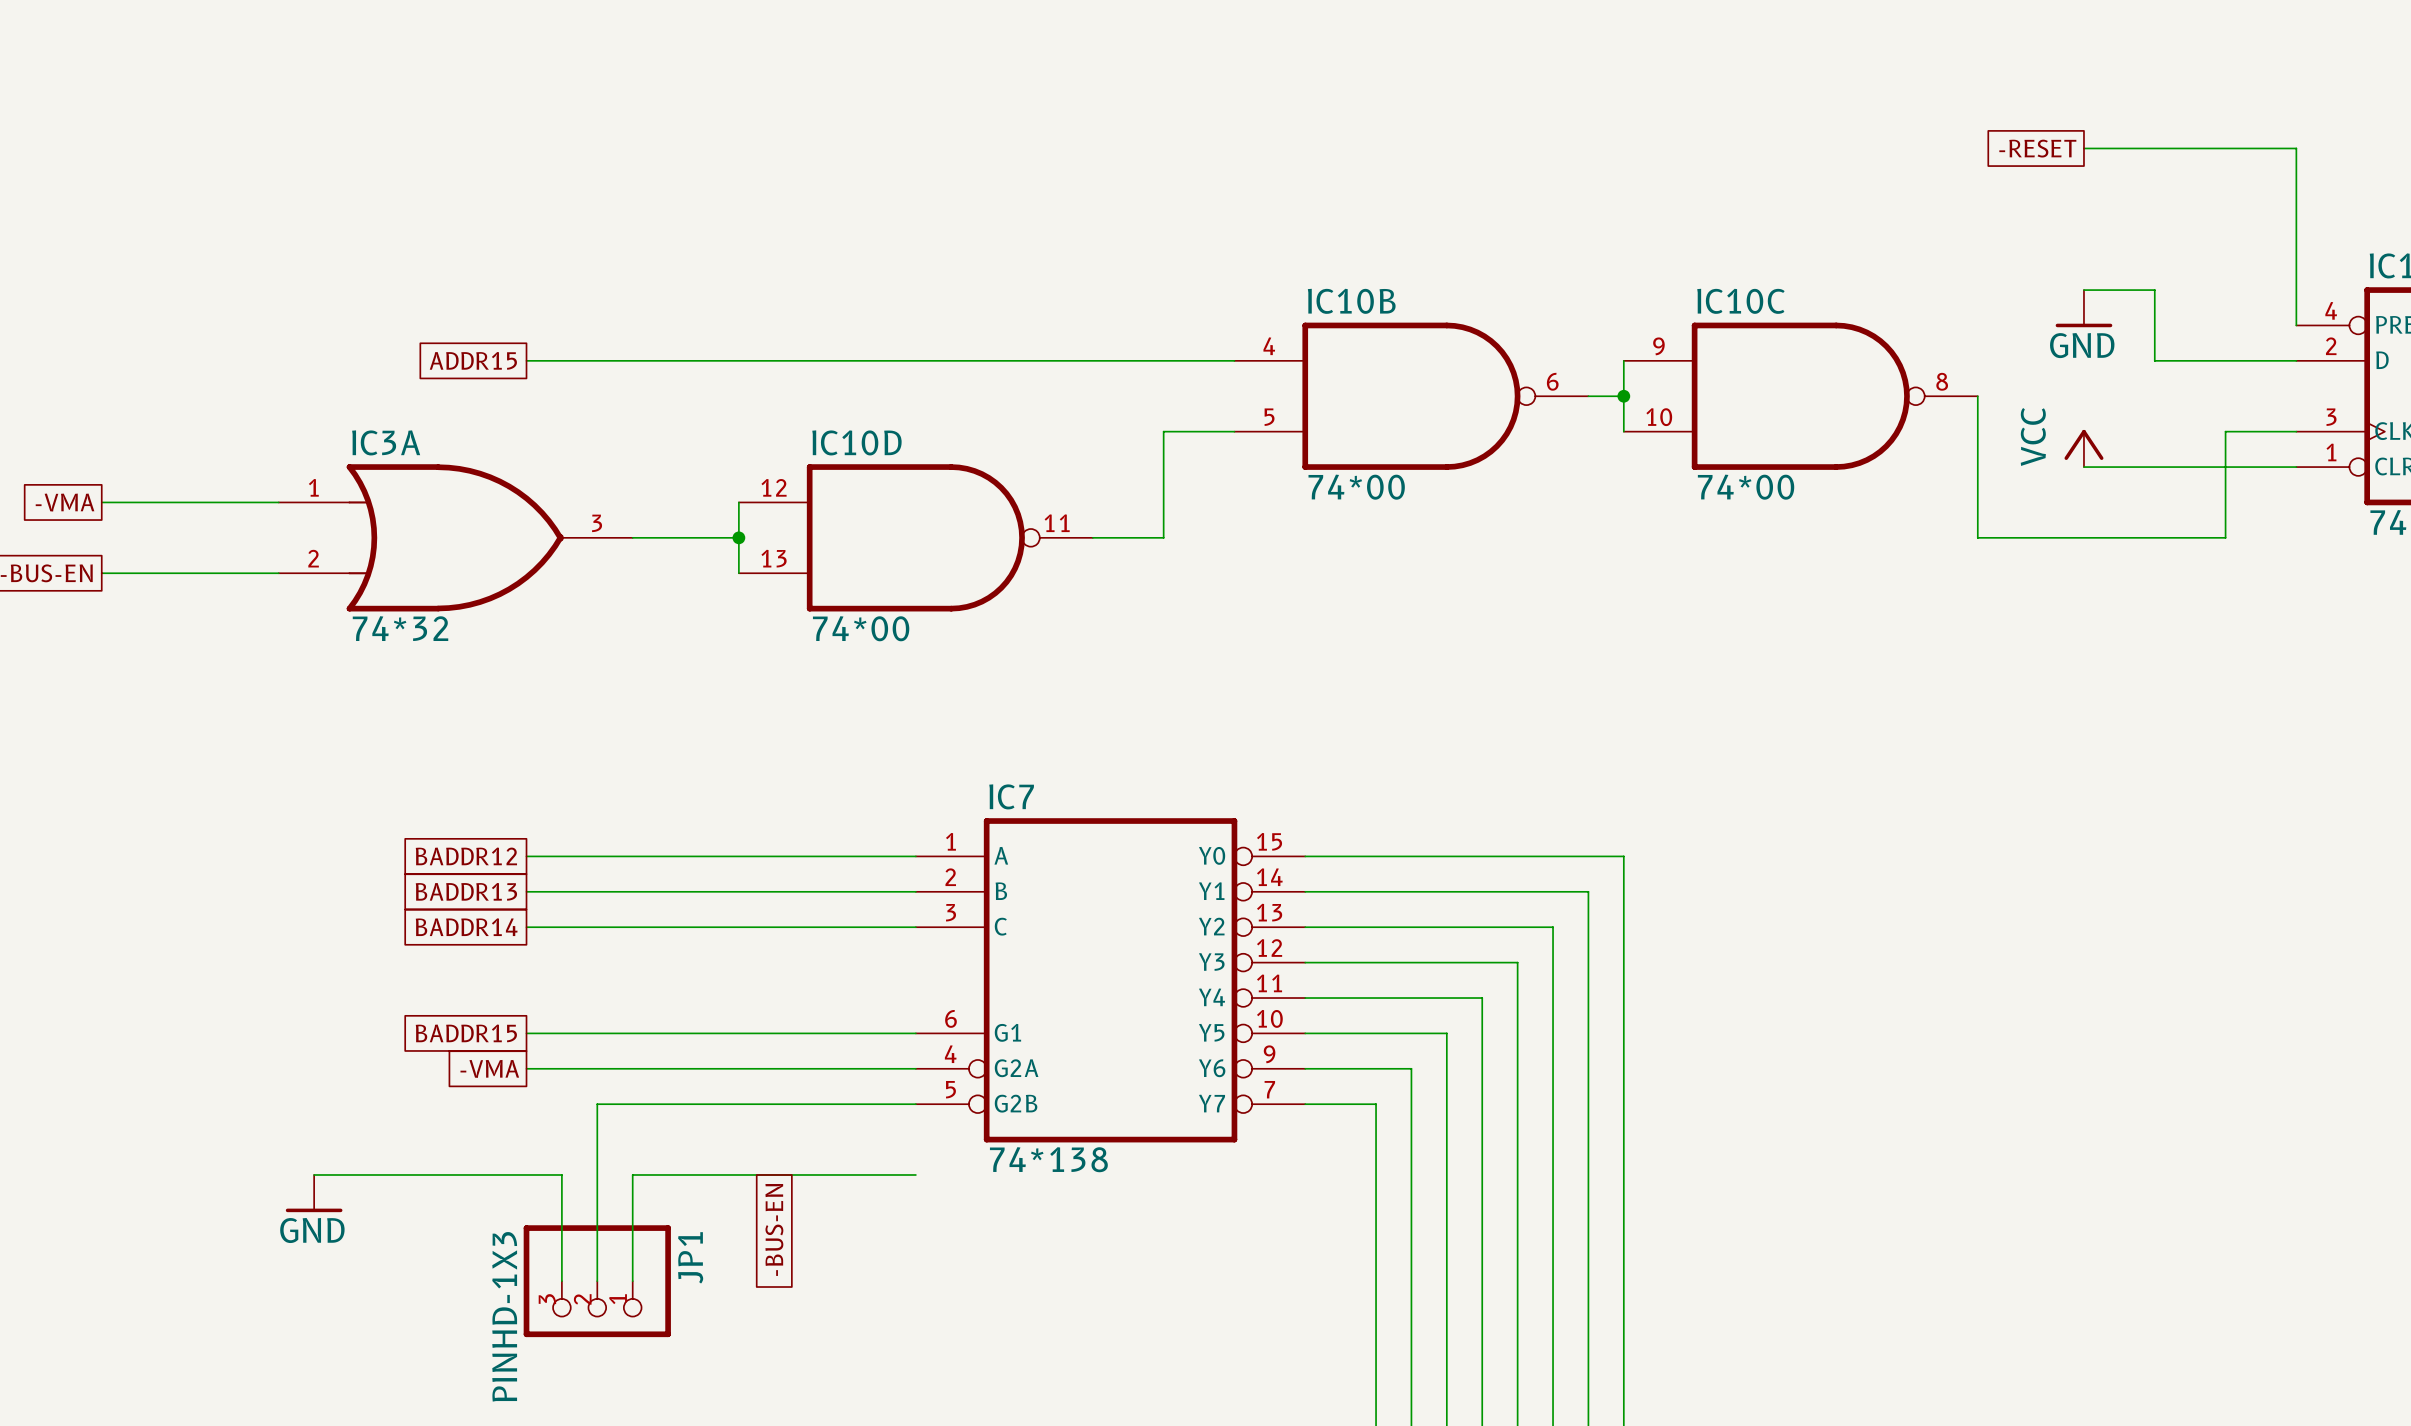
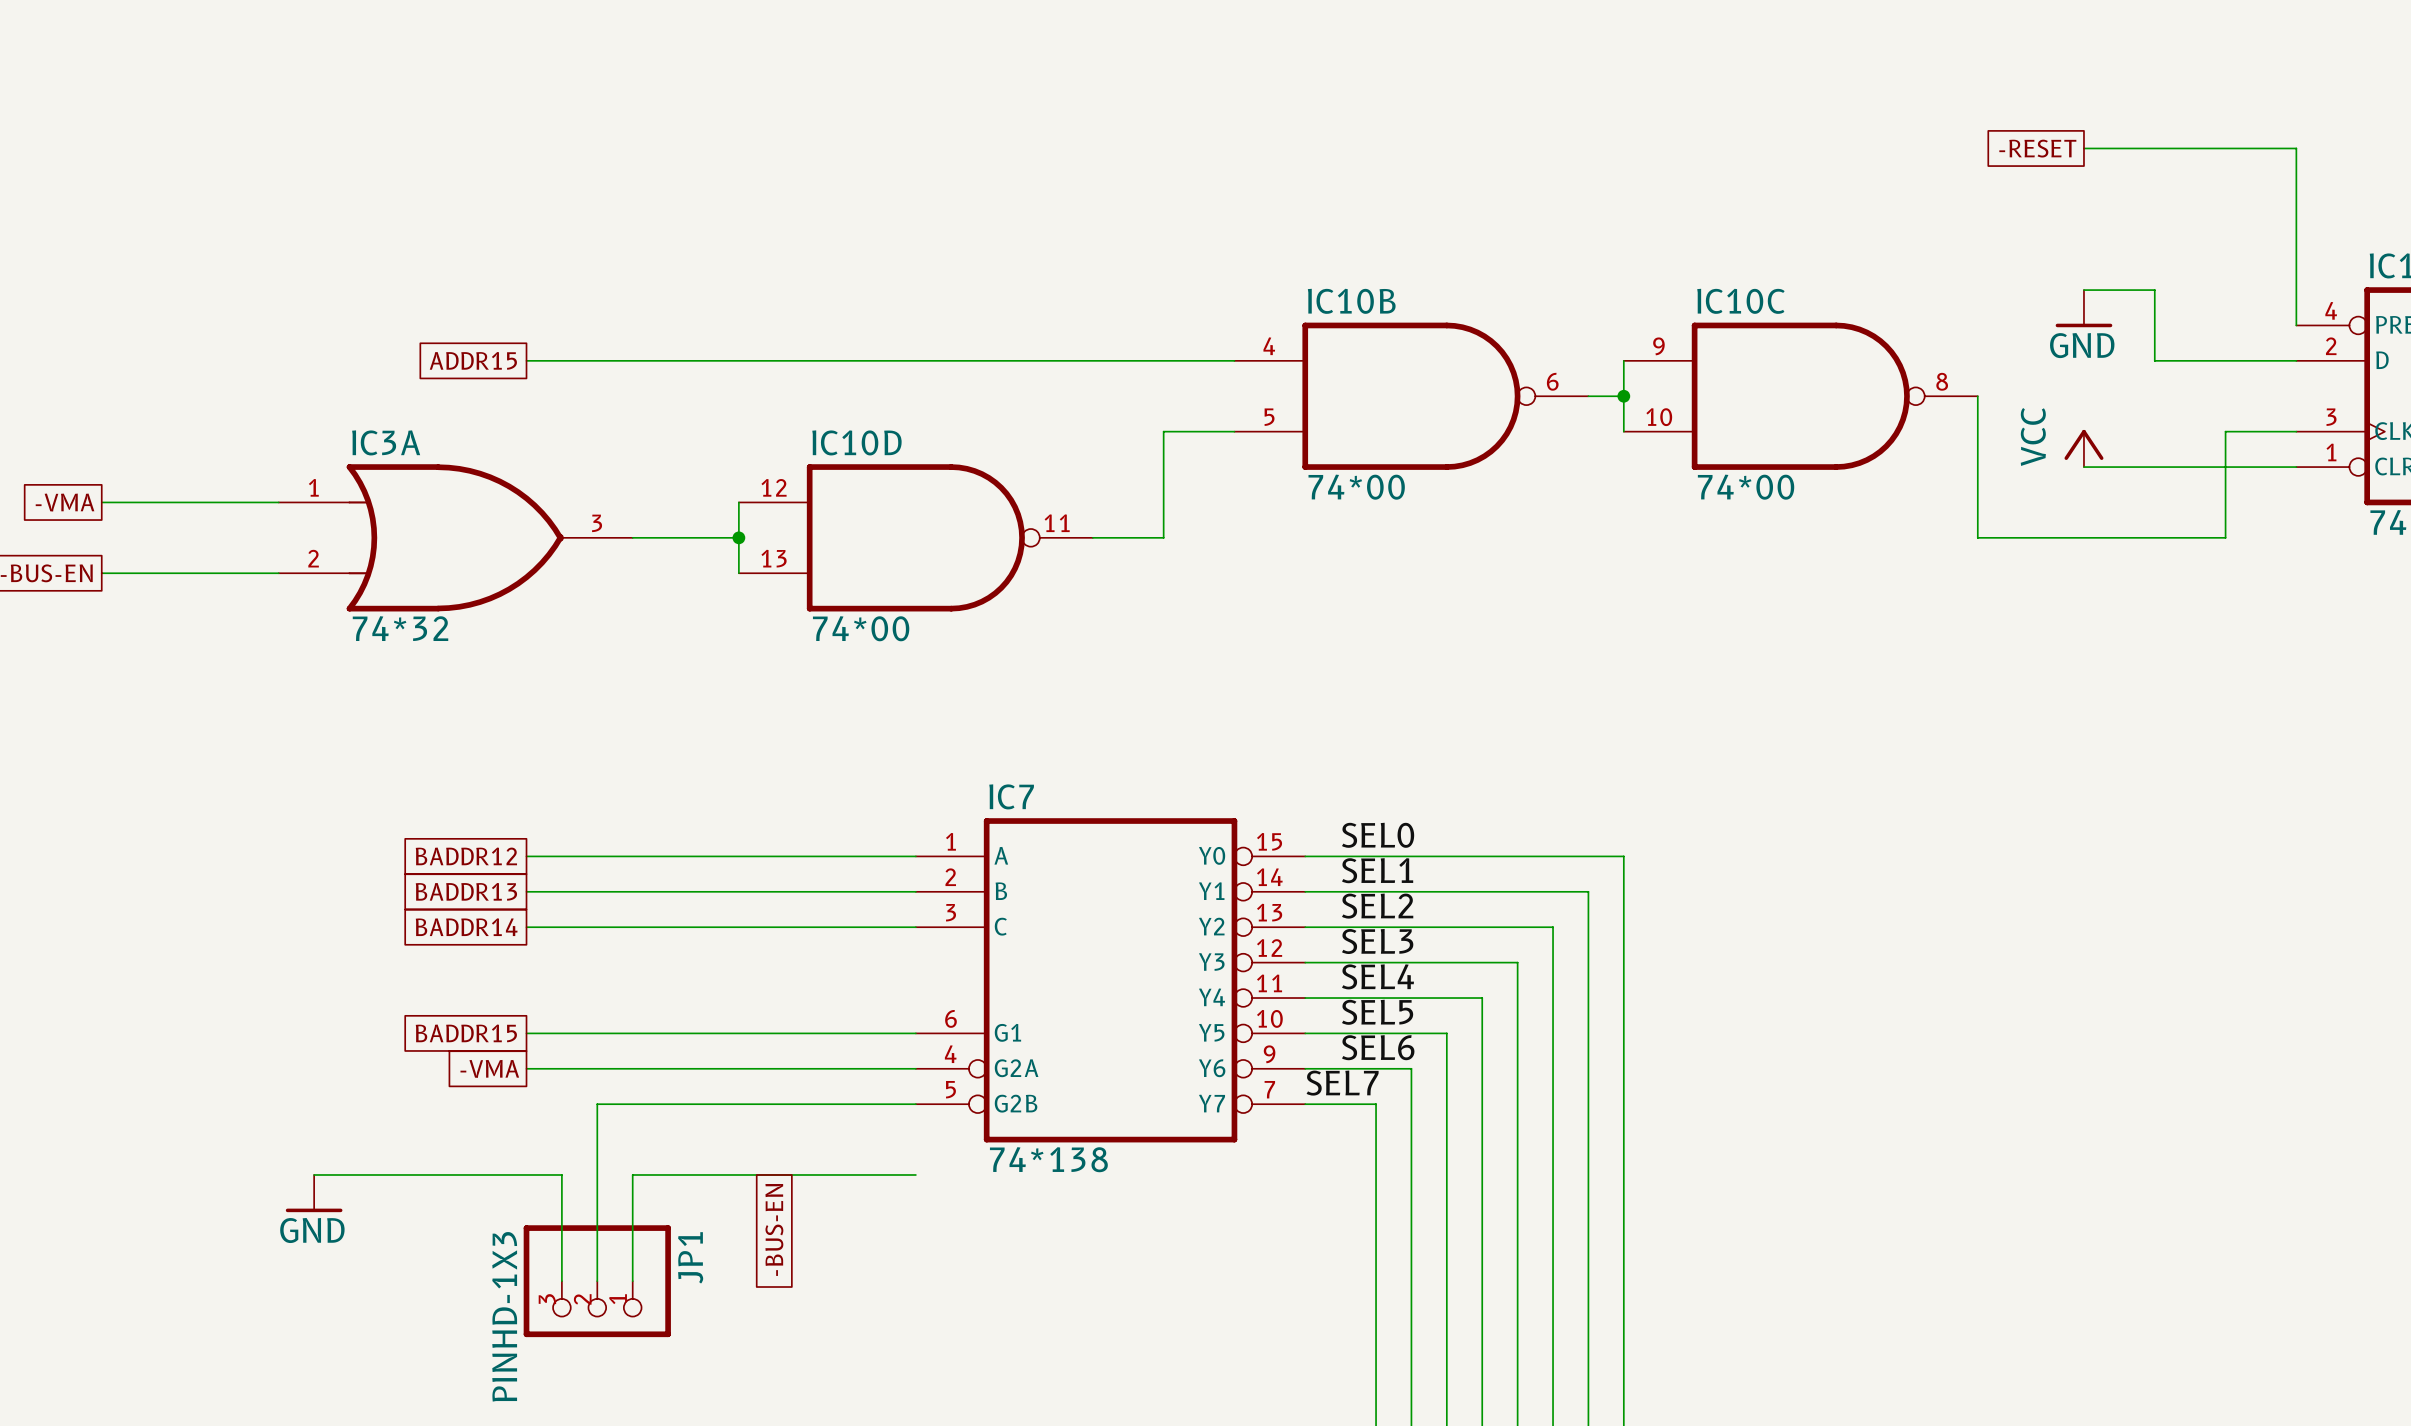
label: none -> SEL0 (1378, 835)
label: none -> SEL1 (1377, 870)
label: none -> SEL2 (1377, 906)
label: none -> SEL3 (1377, 941)
label: none -> SEL4 (1377, 976)
label: none -> SEL5 (1377, 1012)
label: none -> SEL6 (1378, 1047)
label: none -> SEL7 (1342, 1083)

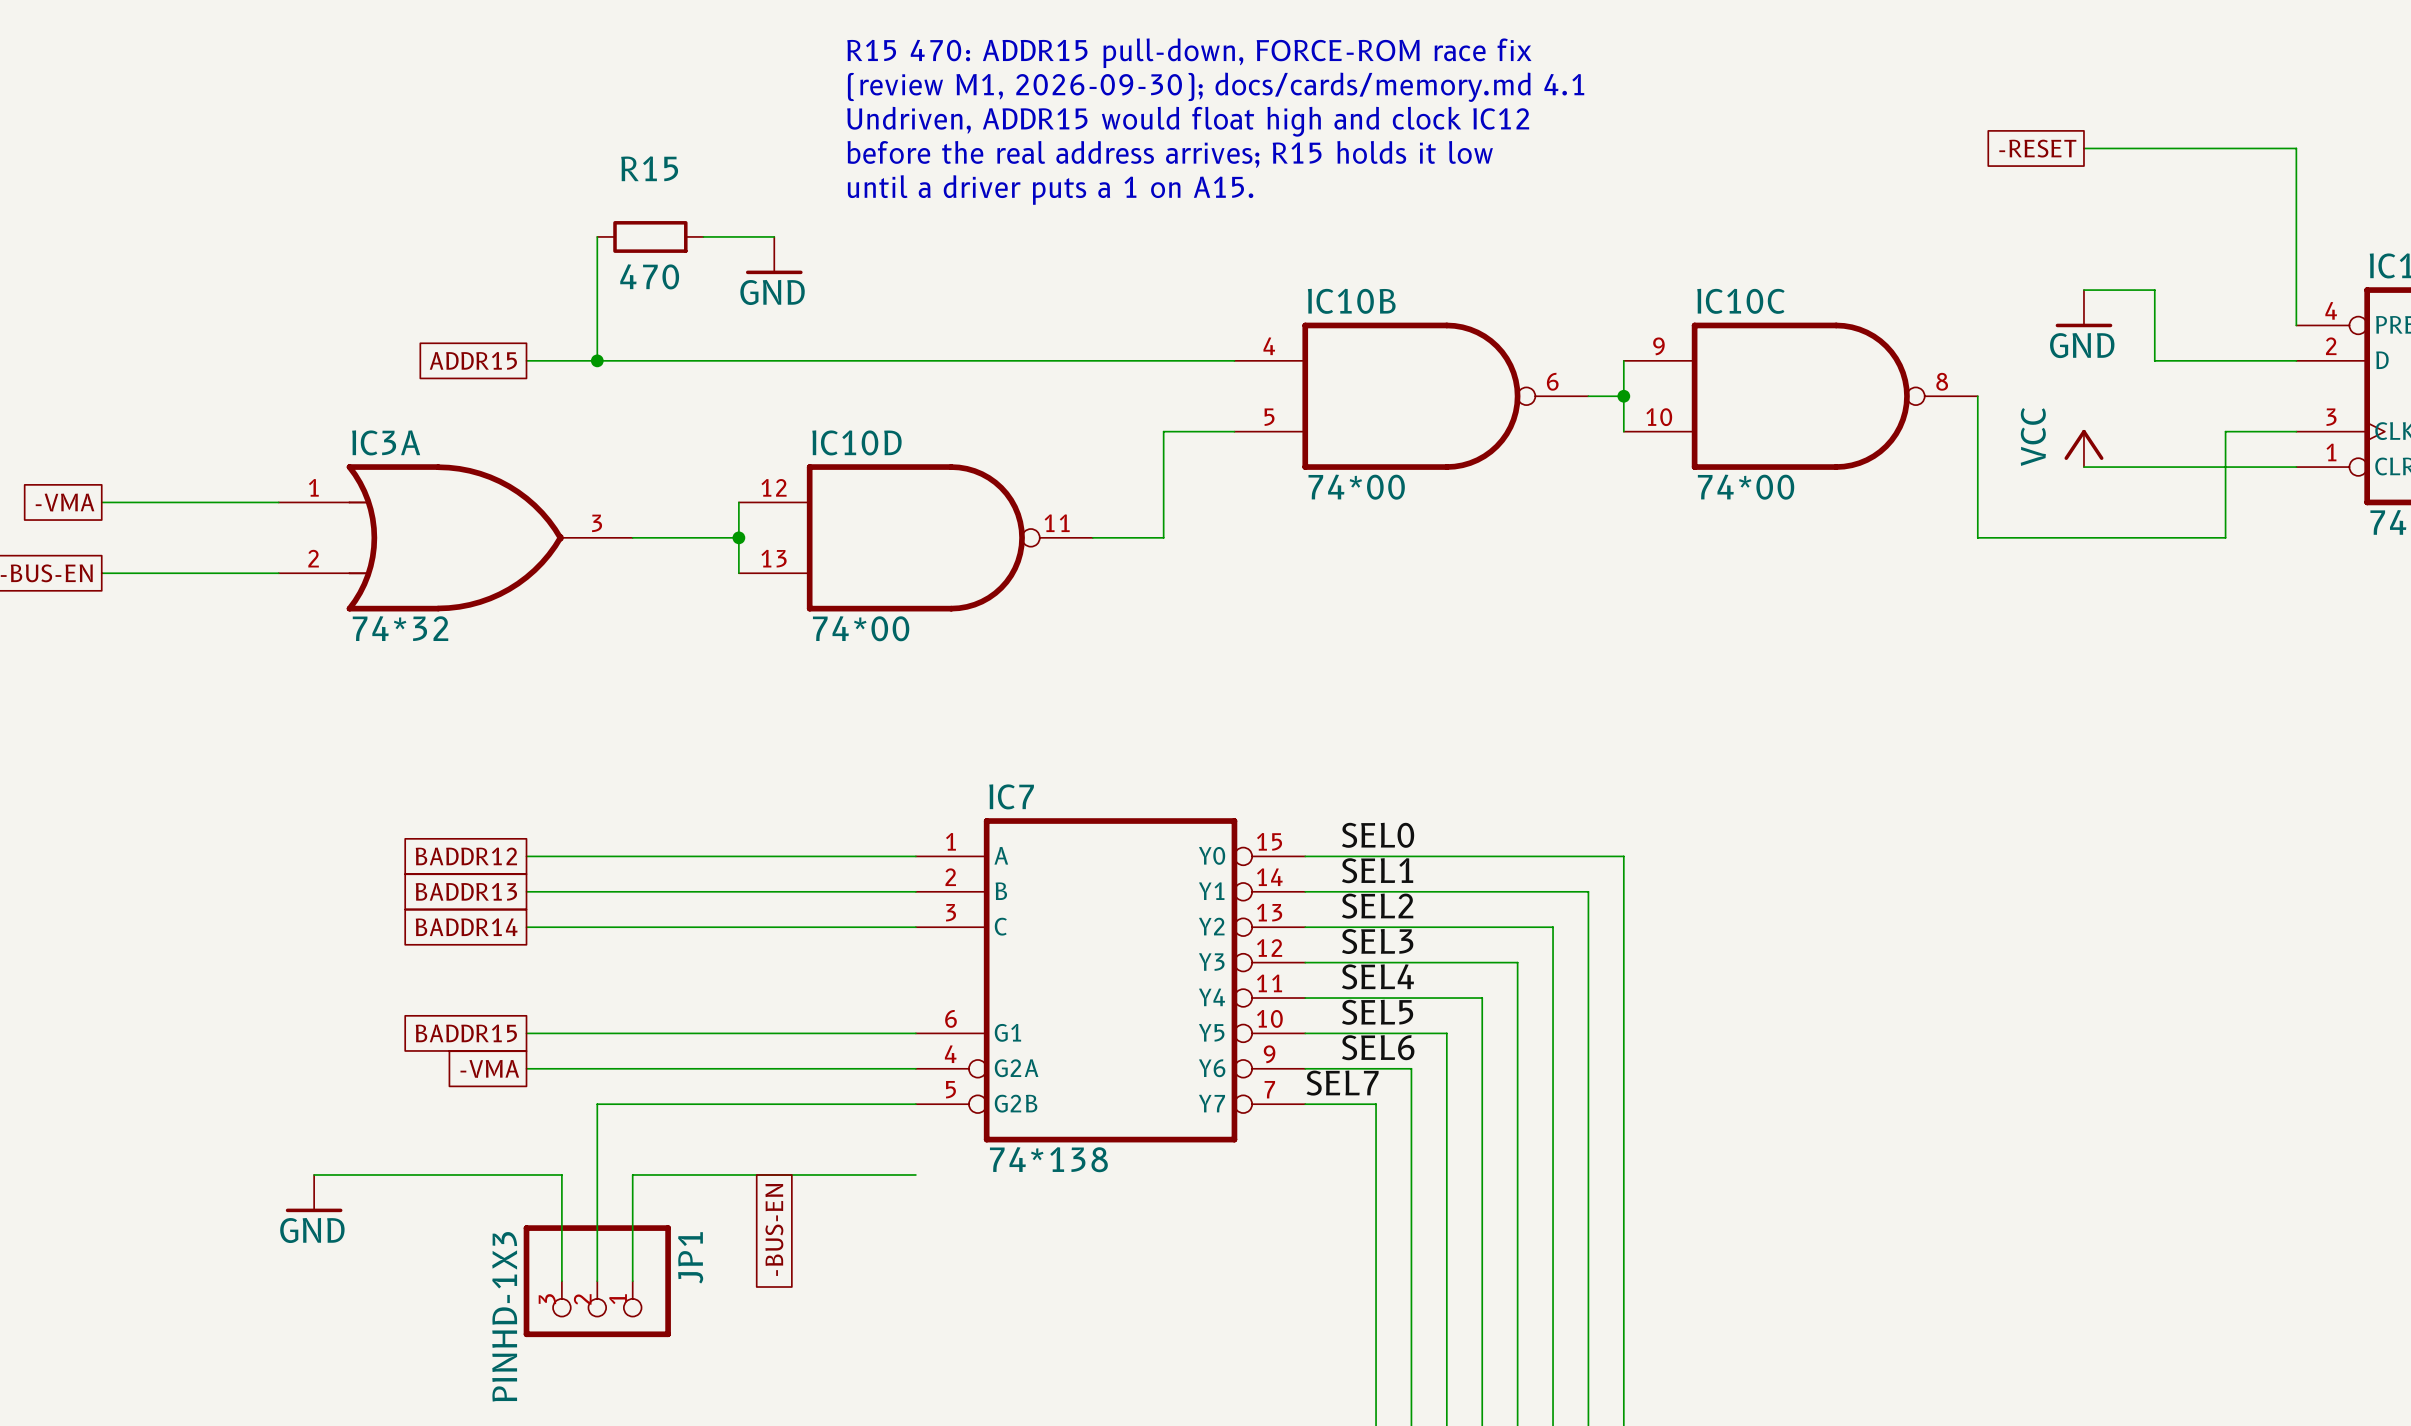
text: none -> R15 470: ADDR15 pull-down, FORCE-ROM race fix (1189, 53)
text: none -> (review M1, 2026-09-30); docs/cards/memory.md 4.1 (1216, 87)
text: none -> Undriven, ADDR15 would float high and clock IC12 (1188, 121)
text: none -> before the real address arrives; R15 holds it low (1170, 154)
text: none -> until a driver puts a 1 on A15. (1050, 190)
wire: none -> (597, 236) (597, 360)
R15: none -> 470 (650, 236)
wire: none -> (703, 236) (774, 236)
power symbol: none -> GND (774, 255)
junction: none -> (597, 360)

